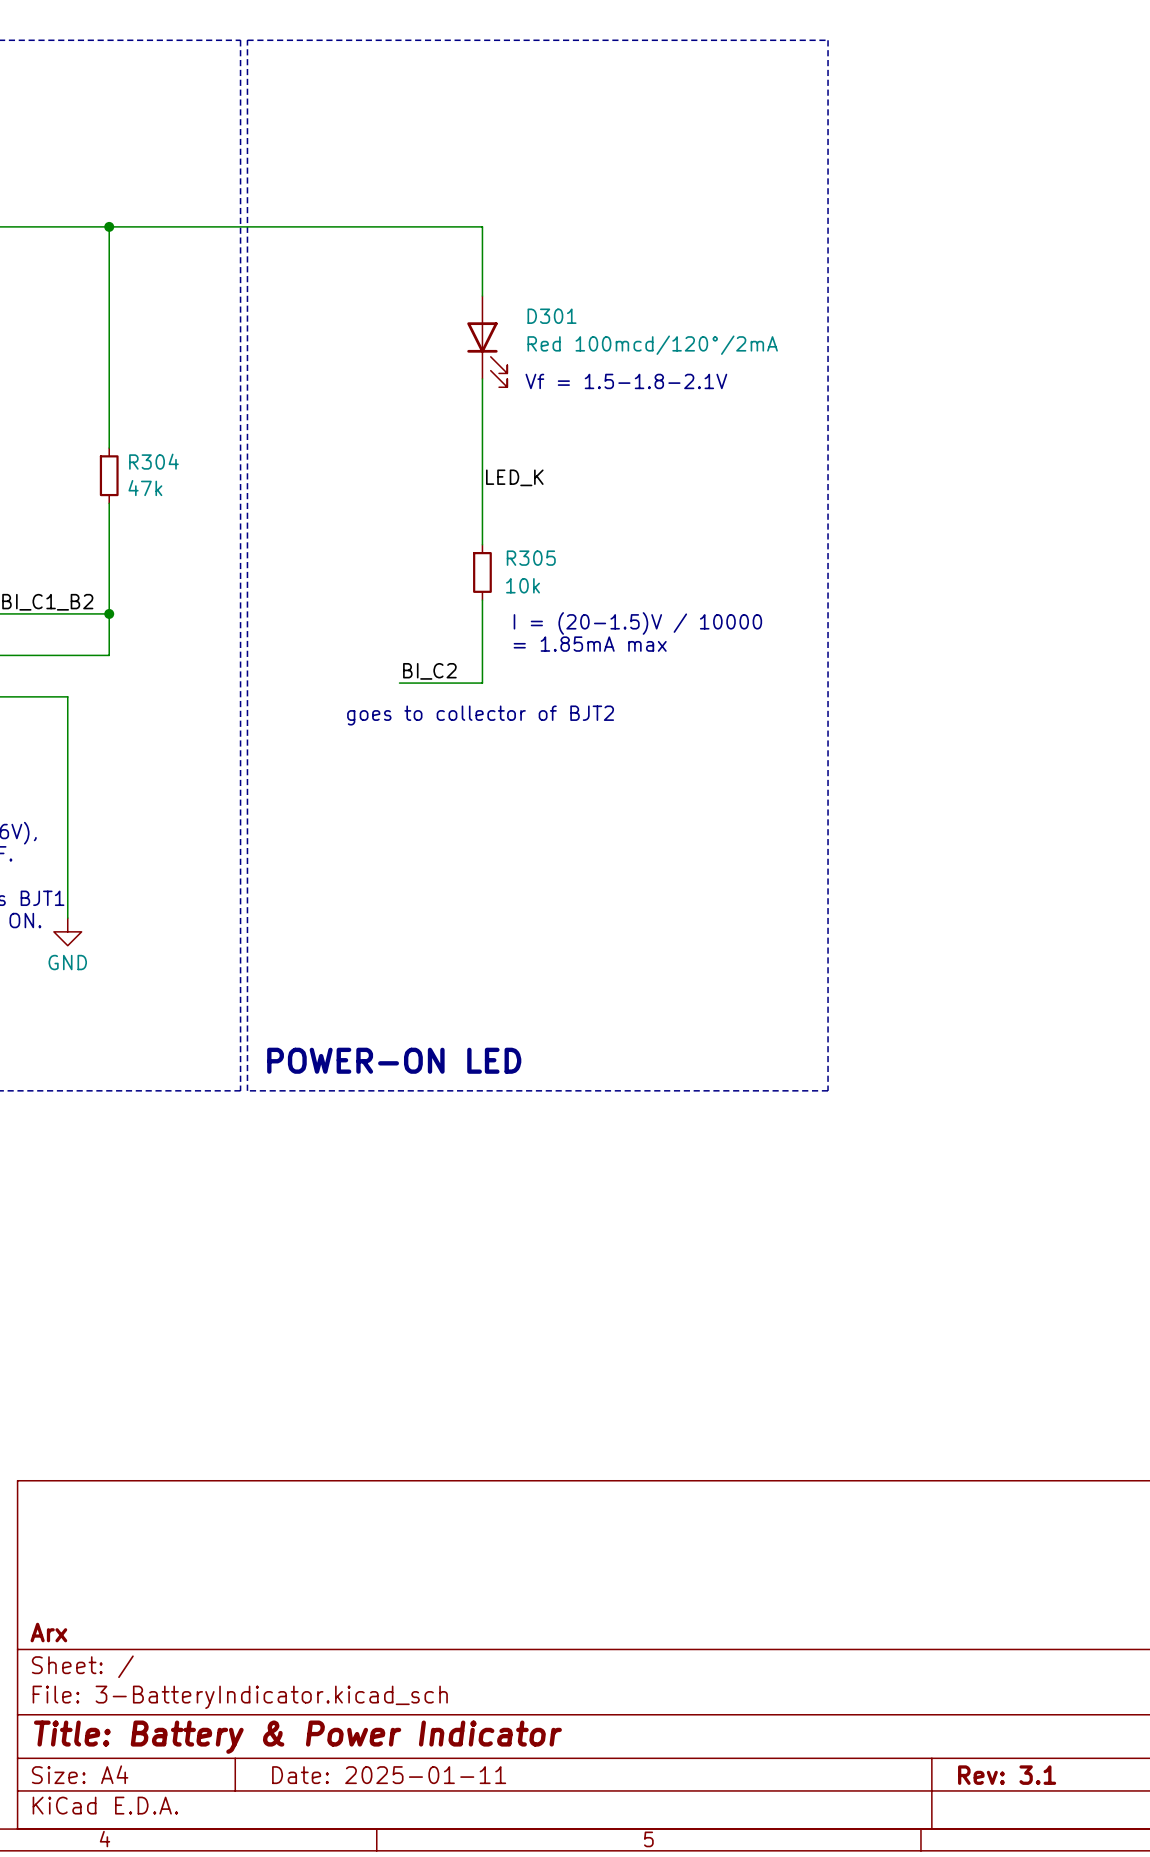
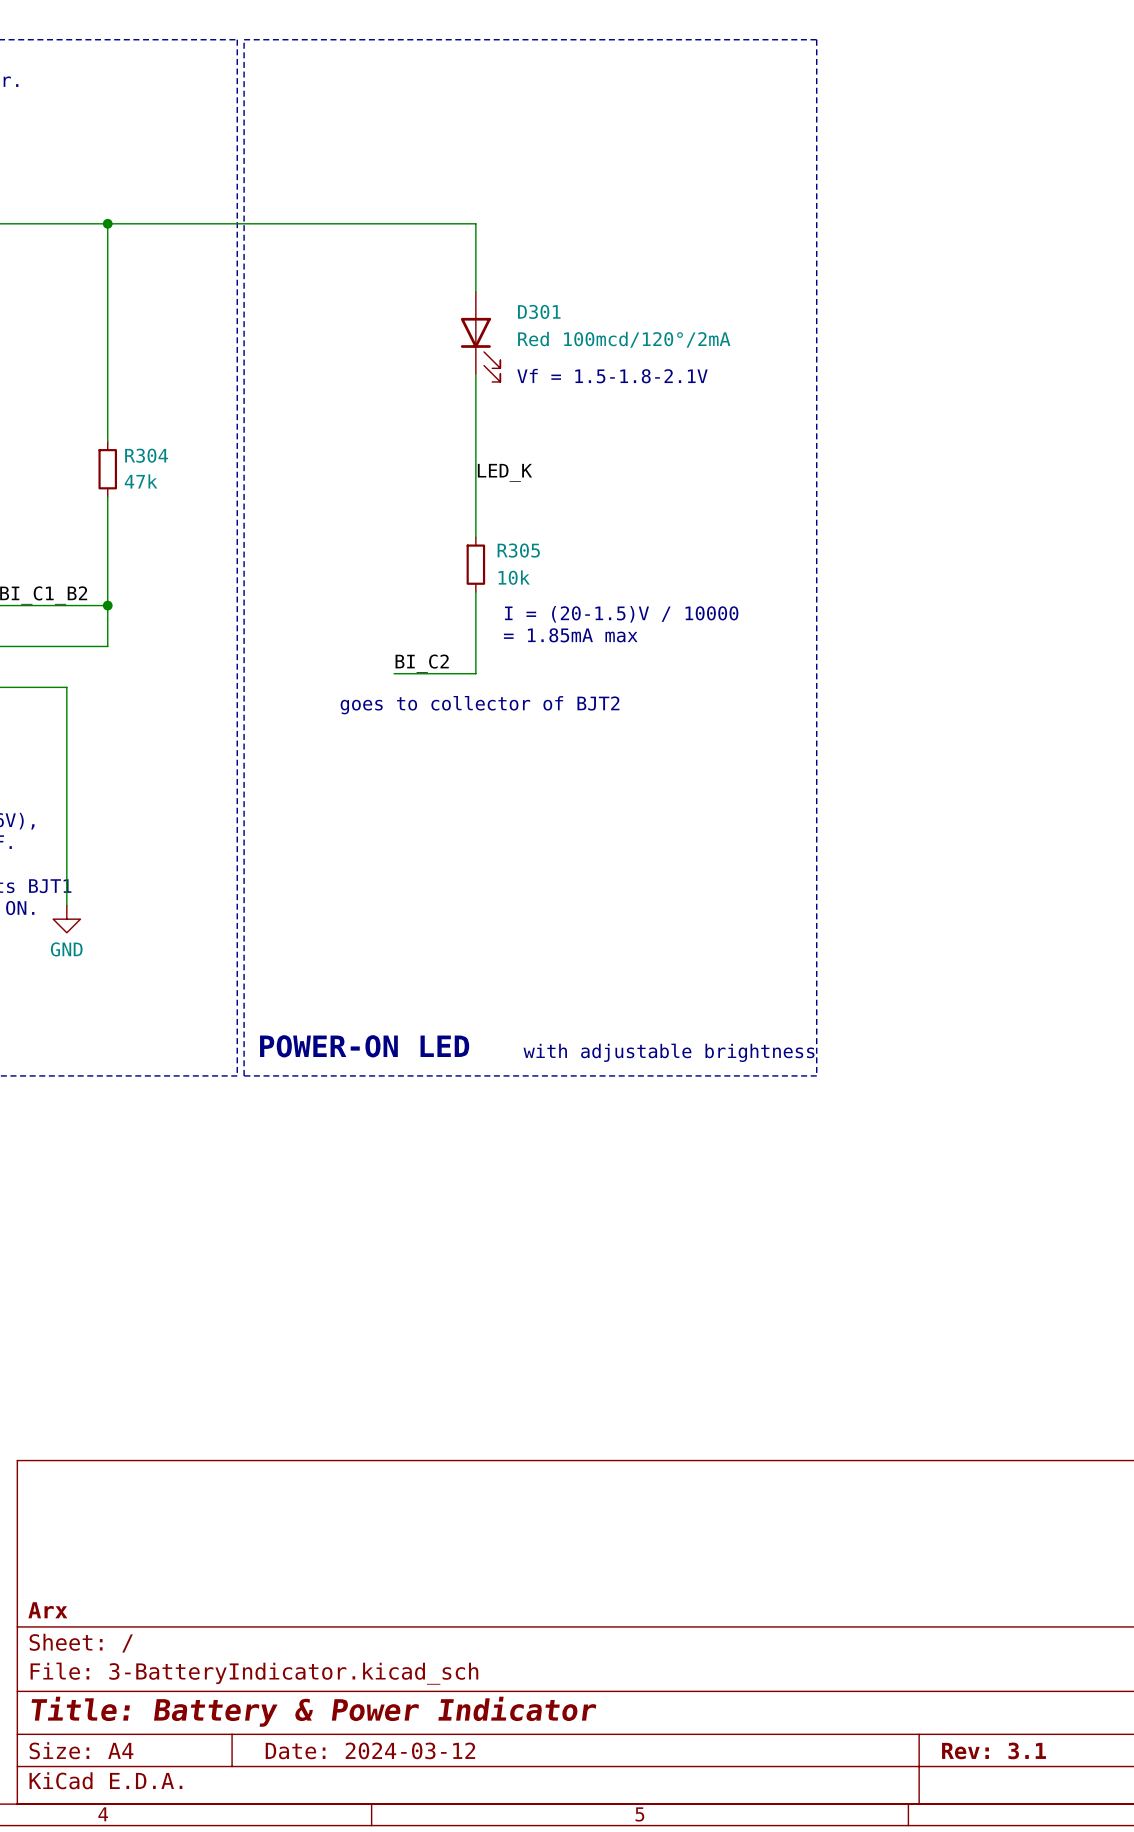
text: none -> with adjustable brightness (669, 1052)
title block: Date: 2025-01-11 (389, 1775) -> Date: 2024-03-12 (370, 1750)

